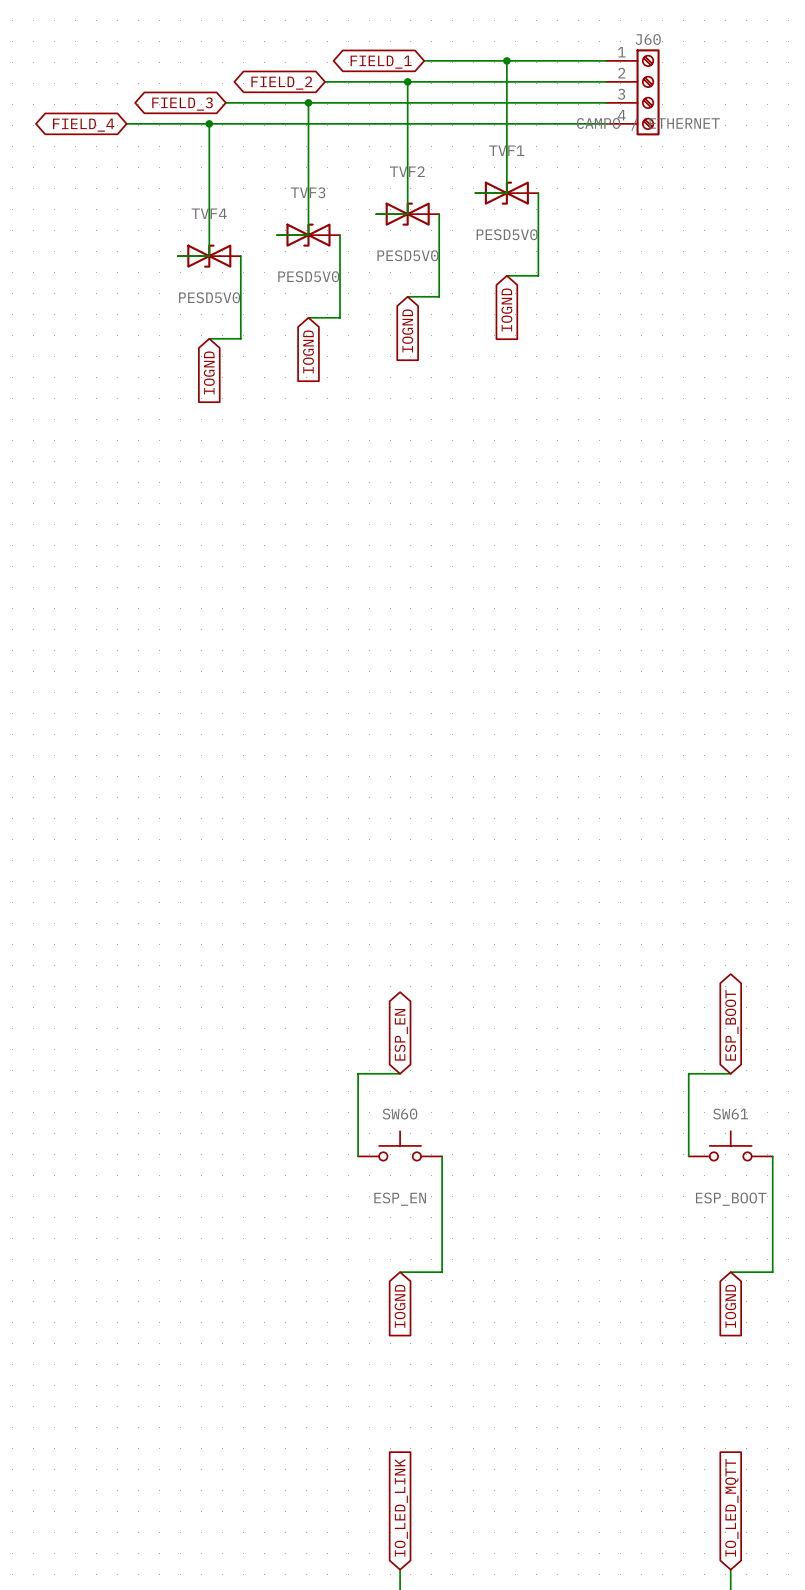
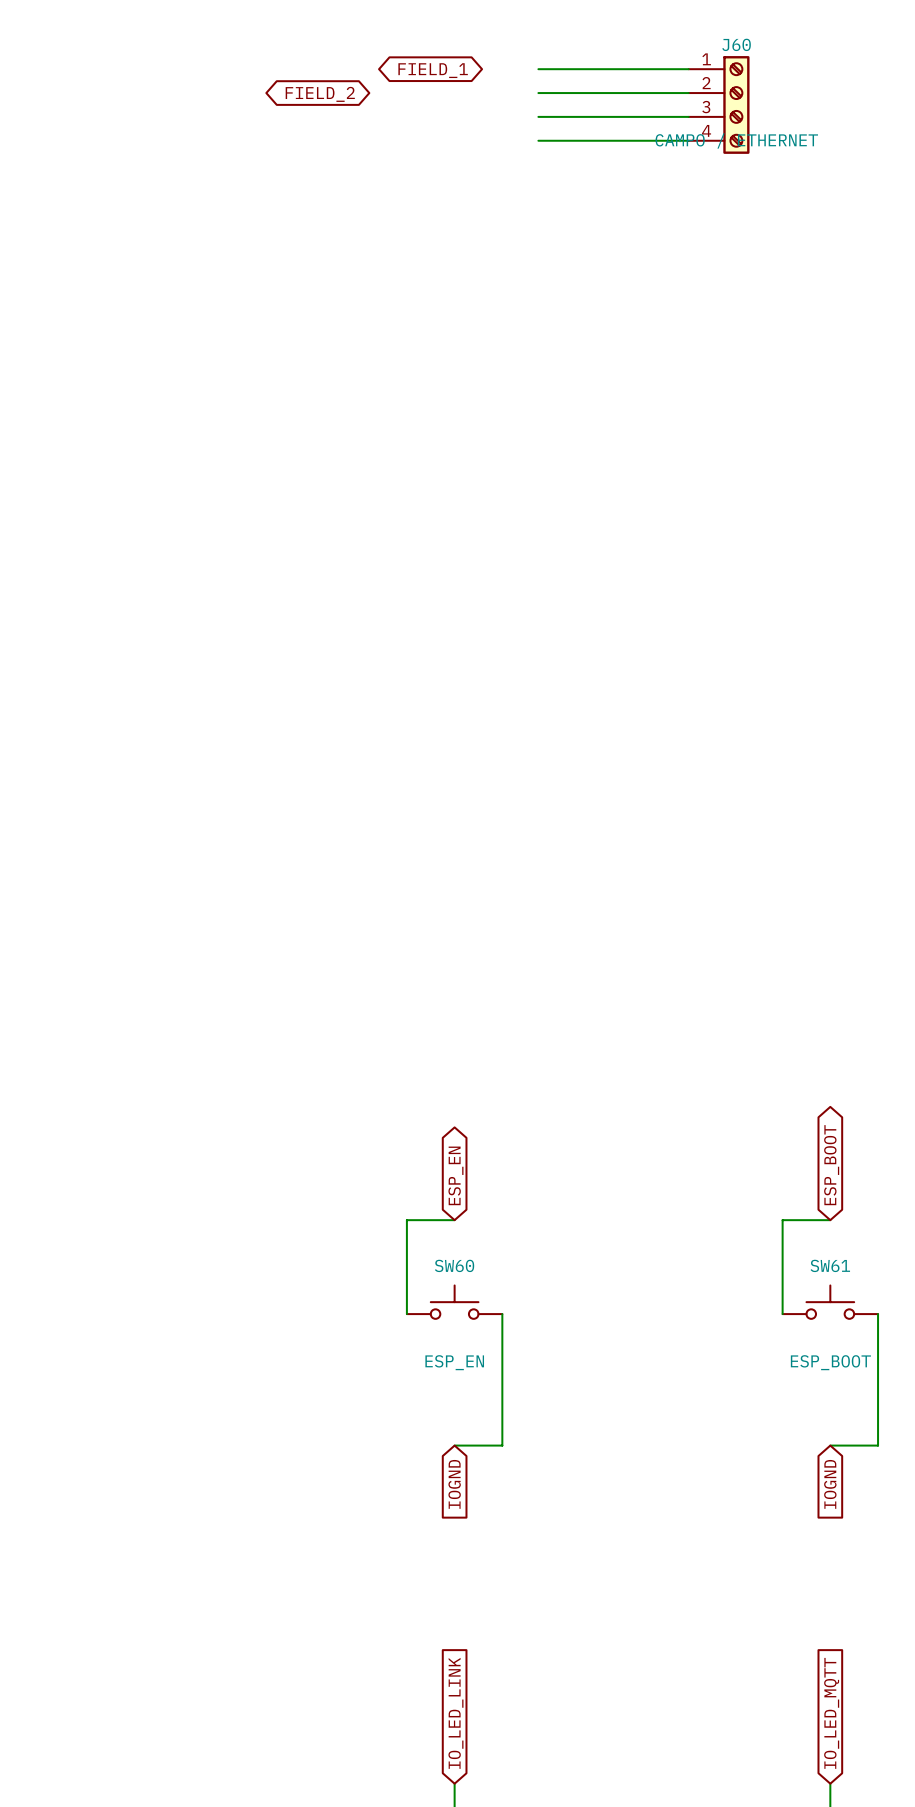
wire: (424, 60) (473, 60) -> none
wire: (506, 60) (506, 193) (475, 193) -> none
junction: (506, 60) -> none
wire: (325, 81) (473, 81) -> none
wire: (407, 81) (407, 214) (376, 214) -> none
junction: (407, 81) -> none
wire: (225, 102) (473, 102) -> none
wire: (308, 102) (308, 235) (277, 235) -> none
junction: (308, 102) -> none
global label: FIELD_3 (182, 104) -> none
wire: (126, 123) (473, 123) -> none
wire: (209, 123) (209, 256) (177, 256) -> none
junction: (209, 123) -> none
global label: FIELD_4 (83, 125) -> none
TVF1: PESD5V0 (506, 193) -> none
wire: (538, 193) (538, 275) (506, 275) -> none
TVF2: PESD5V0 (407, 214) -> none
wire: (439, 214) (439, 296) (407, 296) -> none
TVF3: PESD5V0 (308, 235) -> none
wire: (339, 235) (339, 317) (308, 317) -> none
TVF4: PESD5V0 (209, 256) -> none
wire: (240, 256) (240, 338) (209, 338) -> none
global label: IOGND (506, 309) -> none
global label: IOGND (407, 330) -> none
global label: IOGND (308, 351) -> none
global label: IOGND (209, 372) -> none

